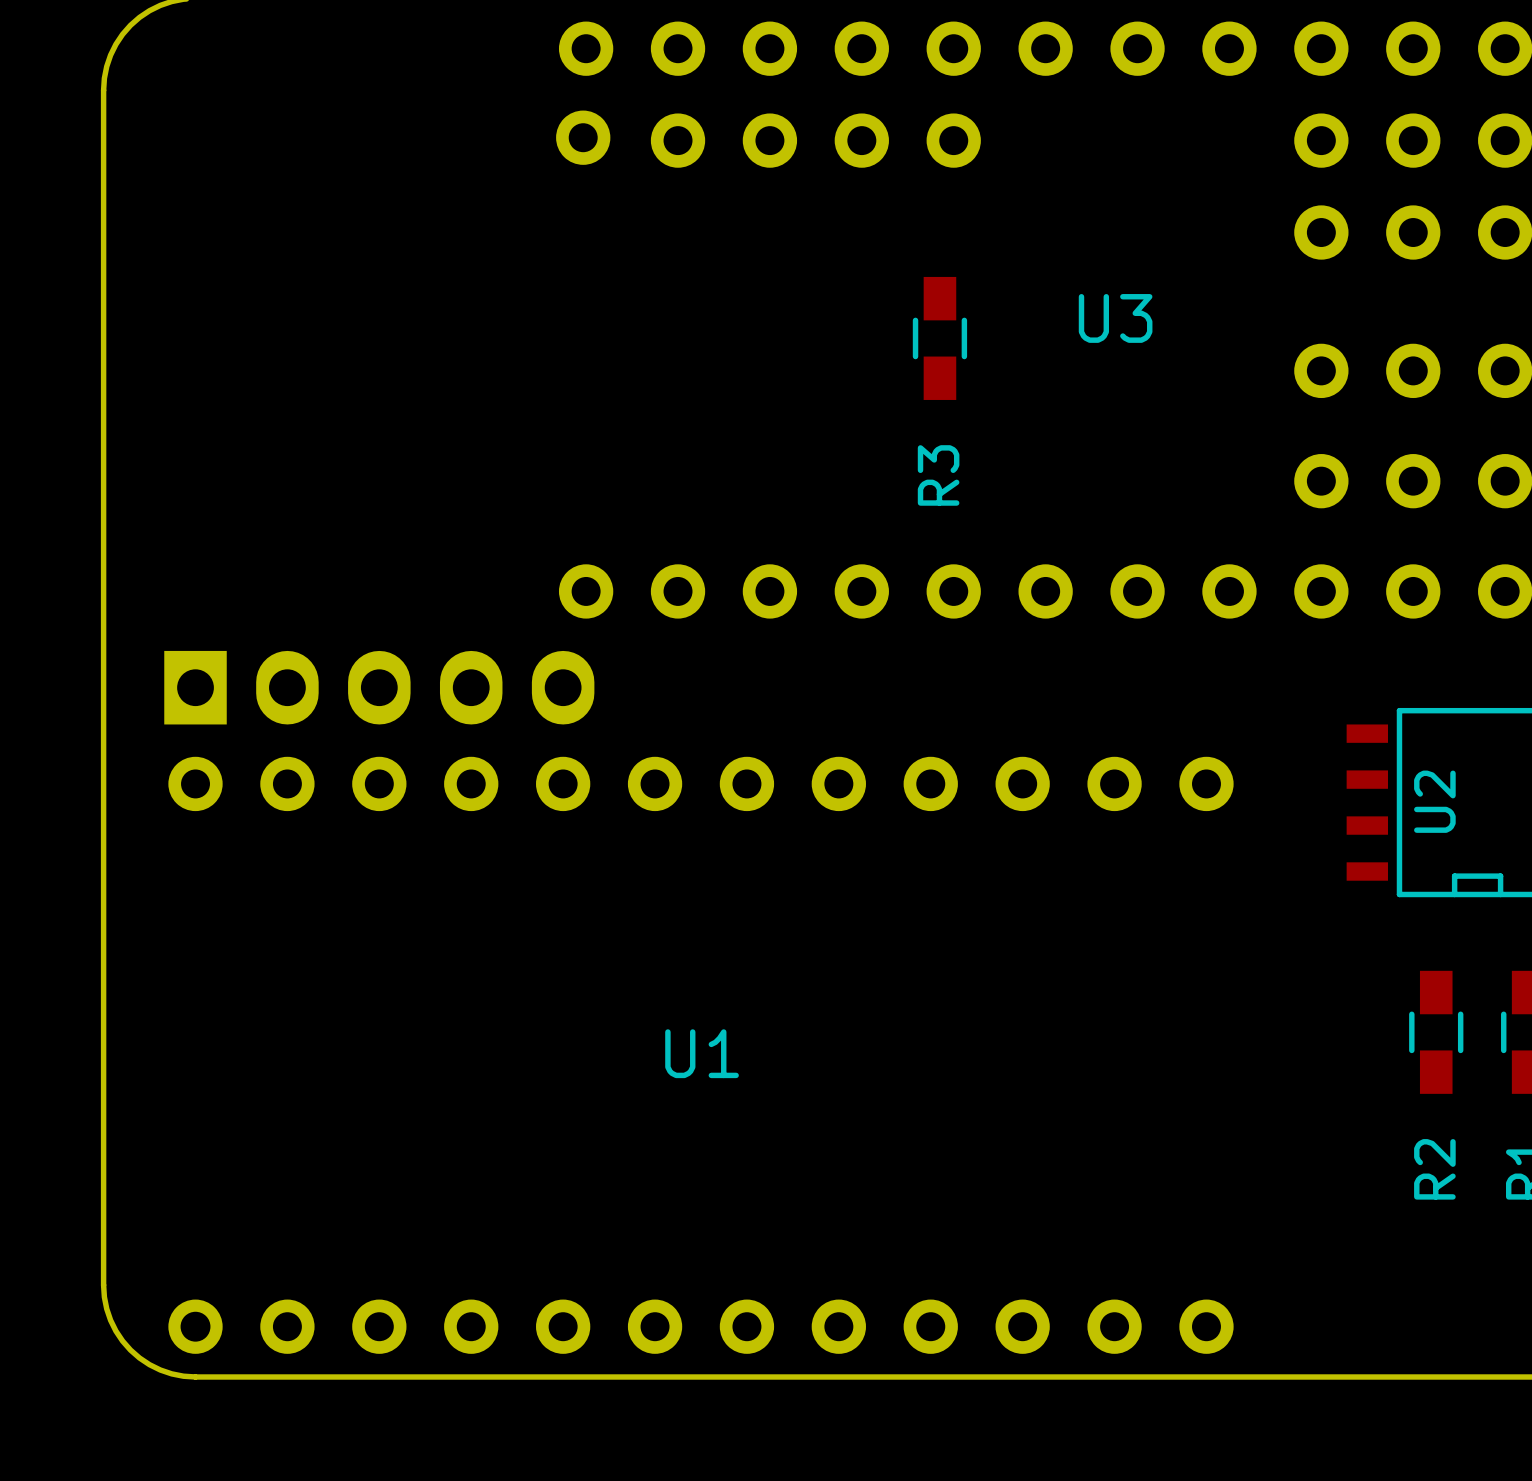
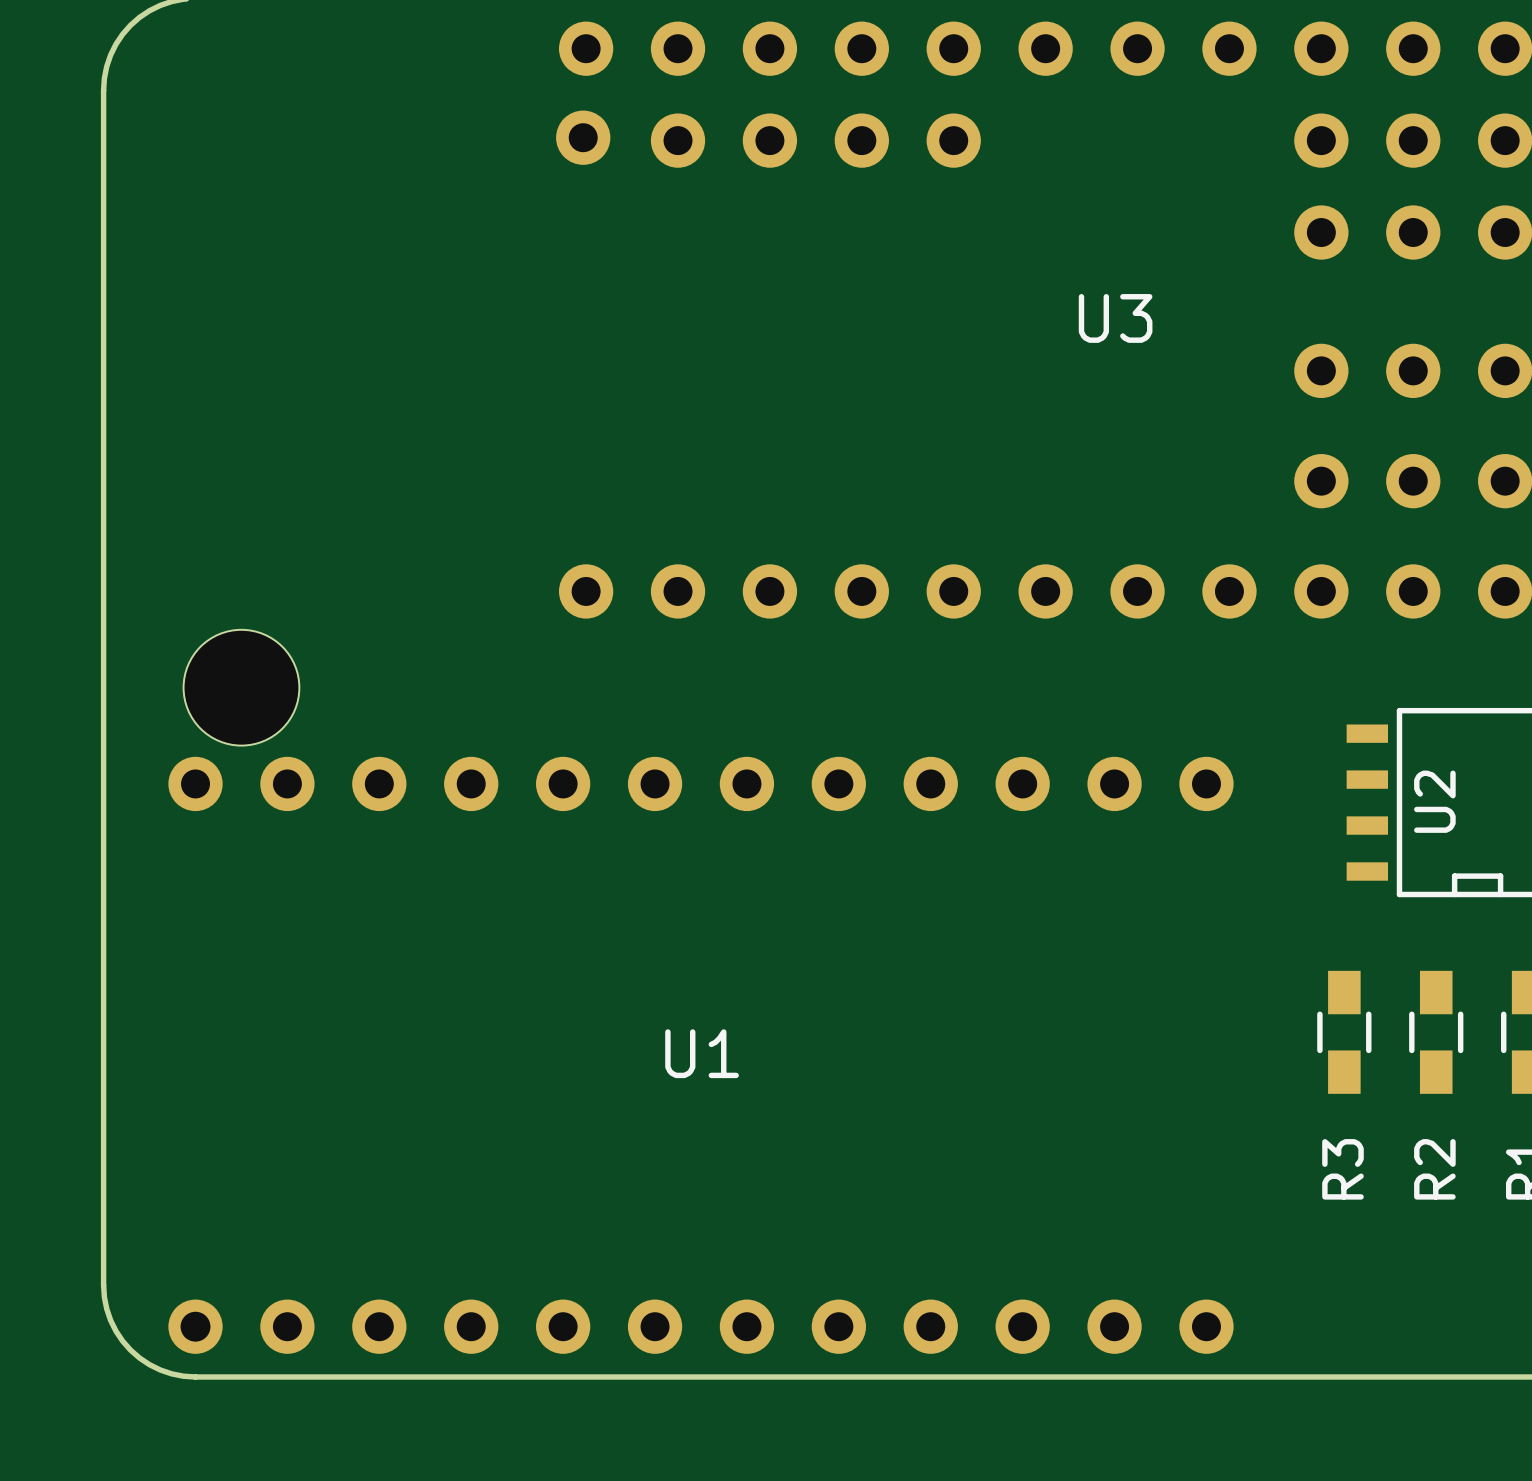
R3 position: (939, 338) -> (1344, 1032)
part: none -> (241, 687)
part: (379, 687) -> none

